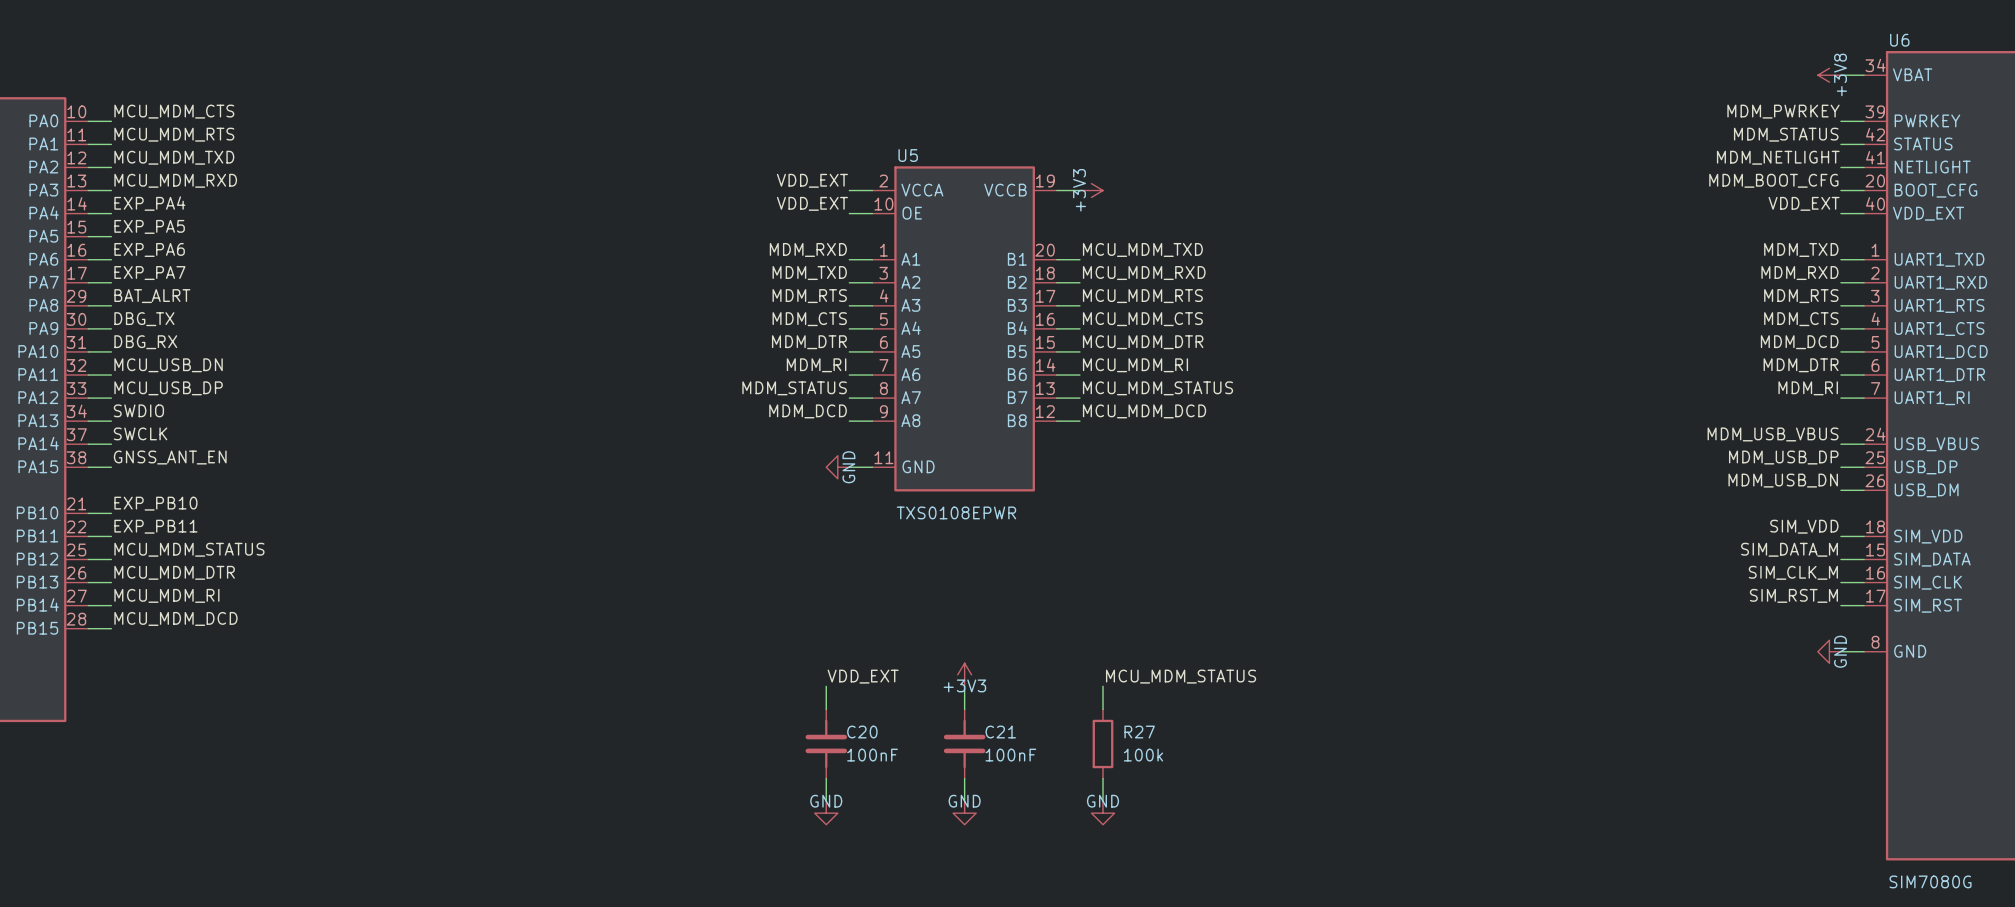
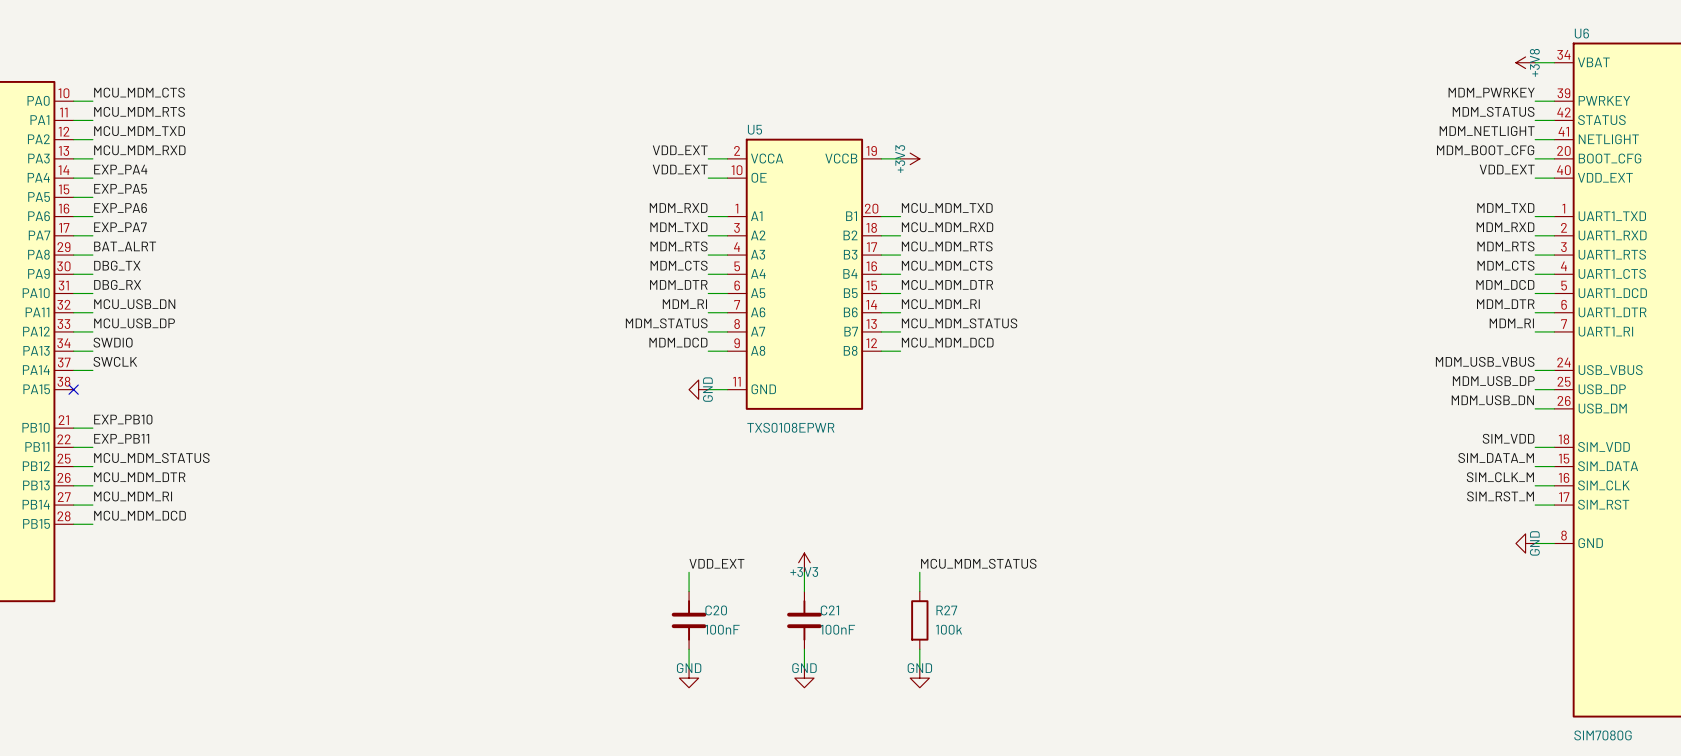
label: GNSS_ANT_EN (170, 457) -> none
wire: (88, 467) (111, 467) -> none
no-connect mark: none -> (73, 389)

